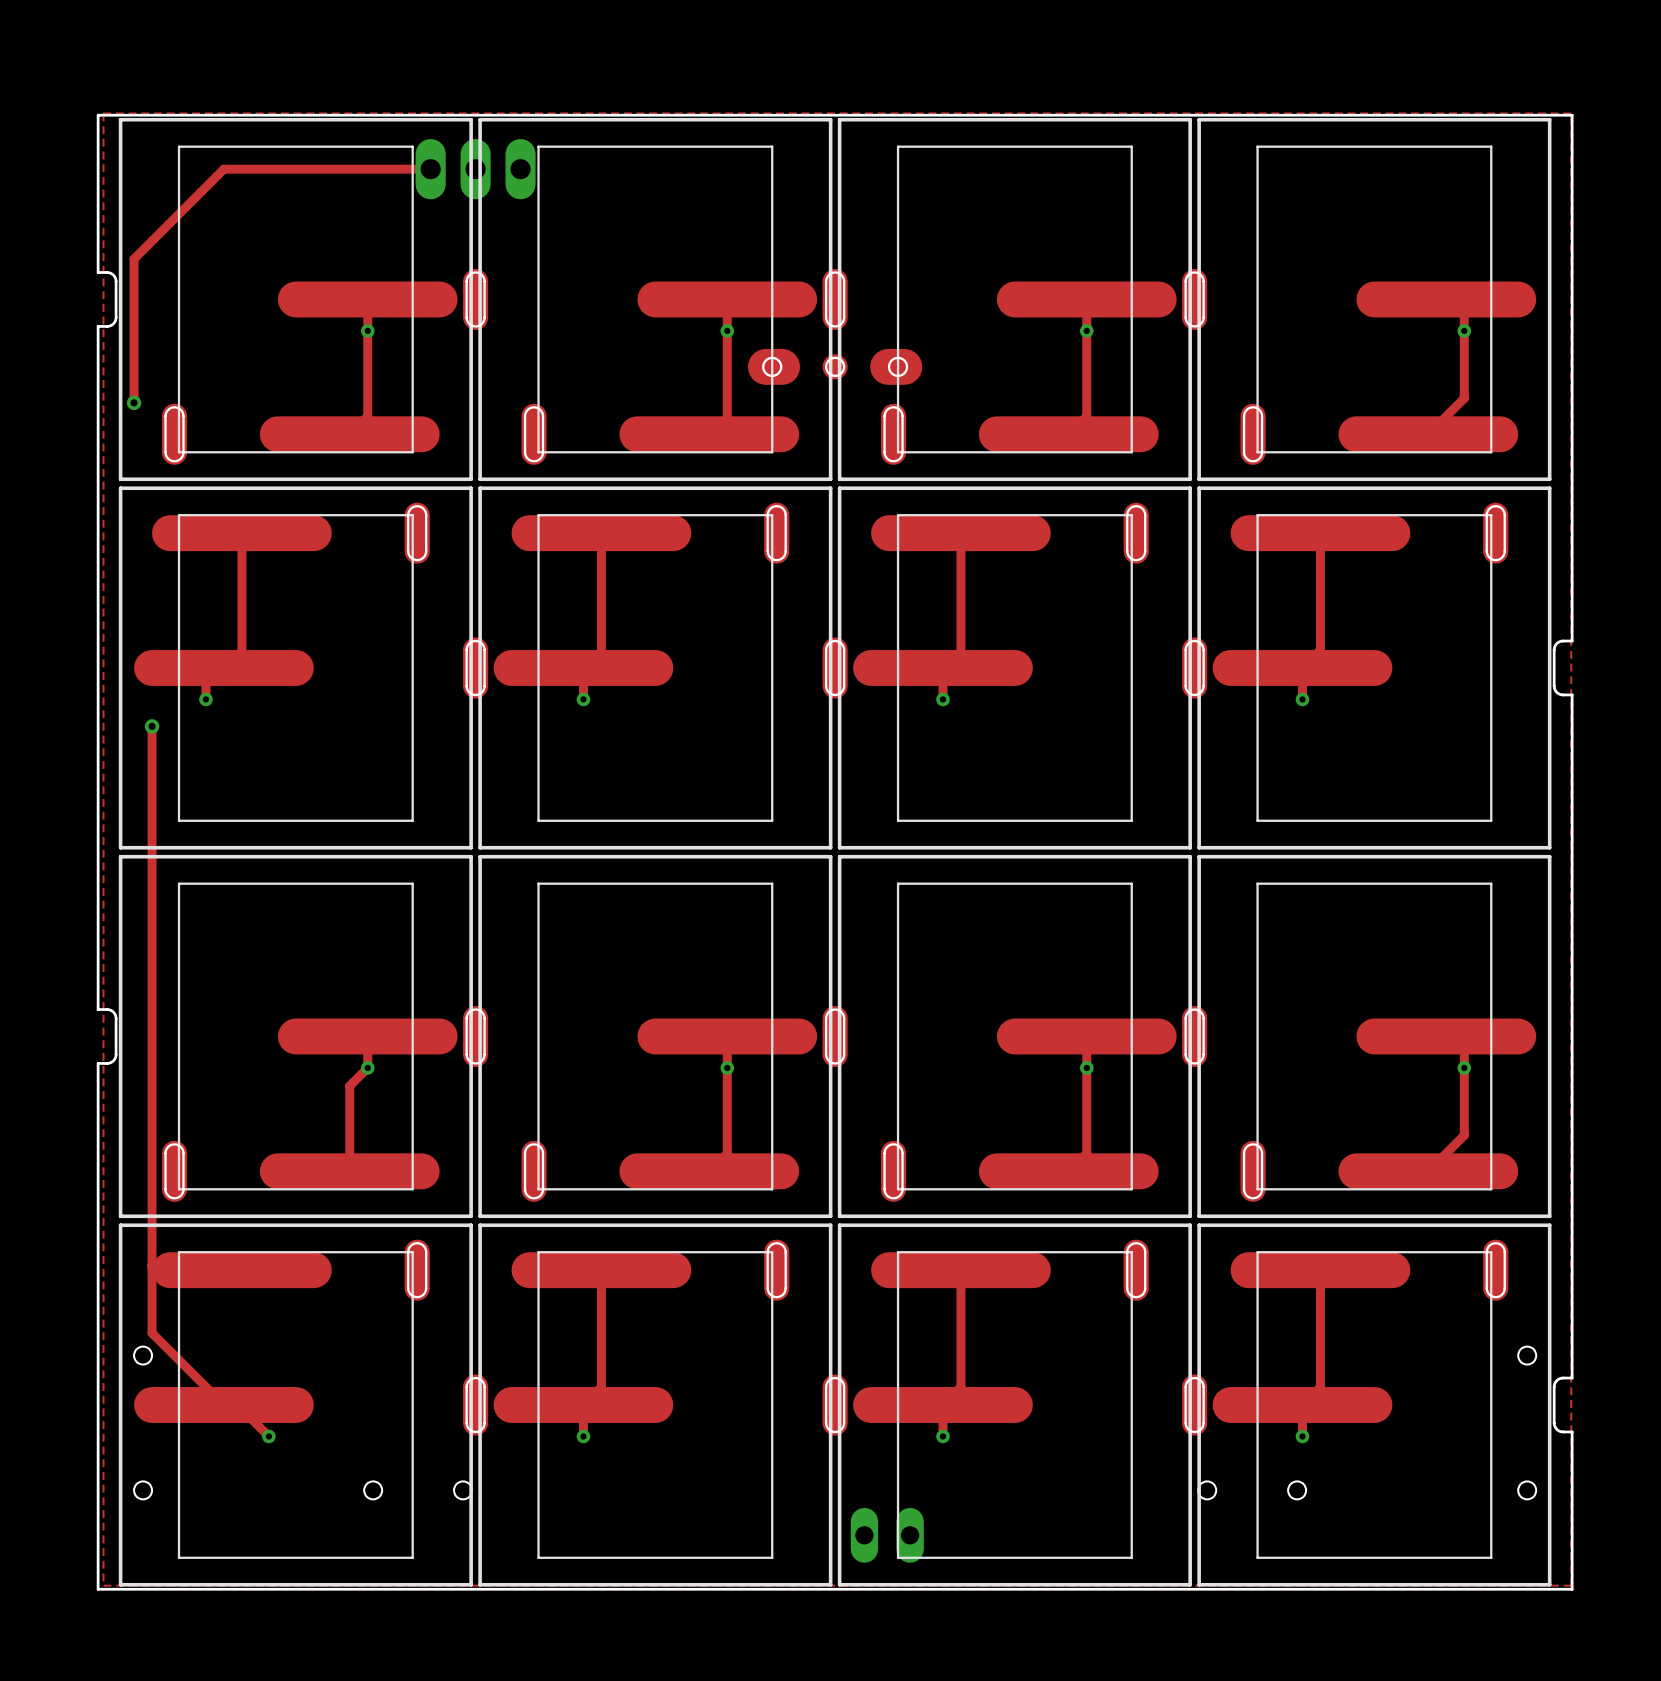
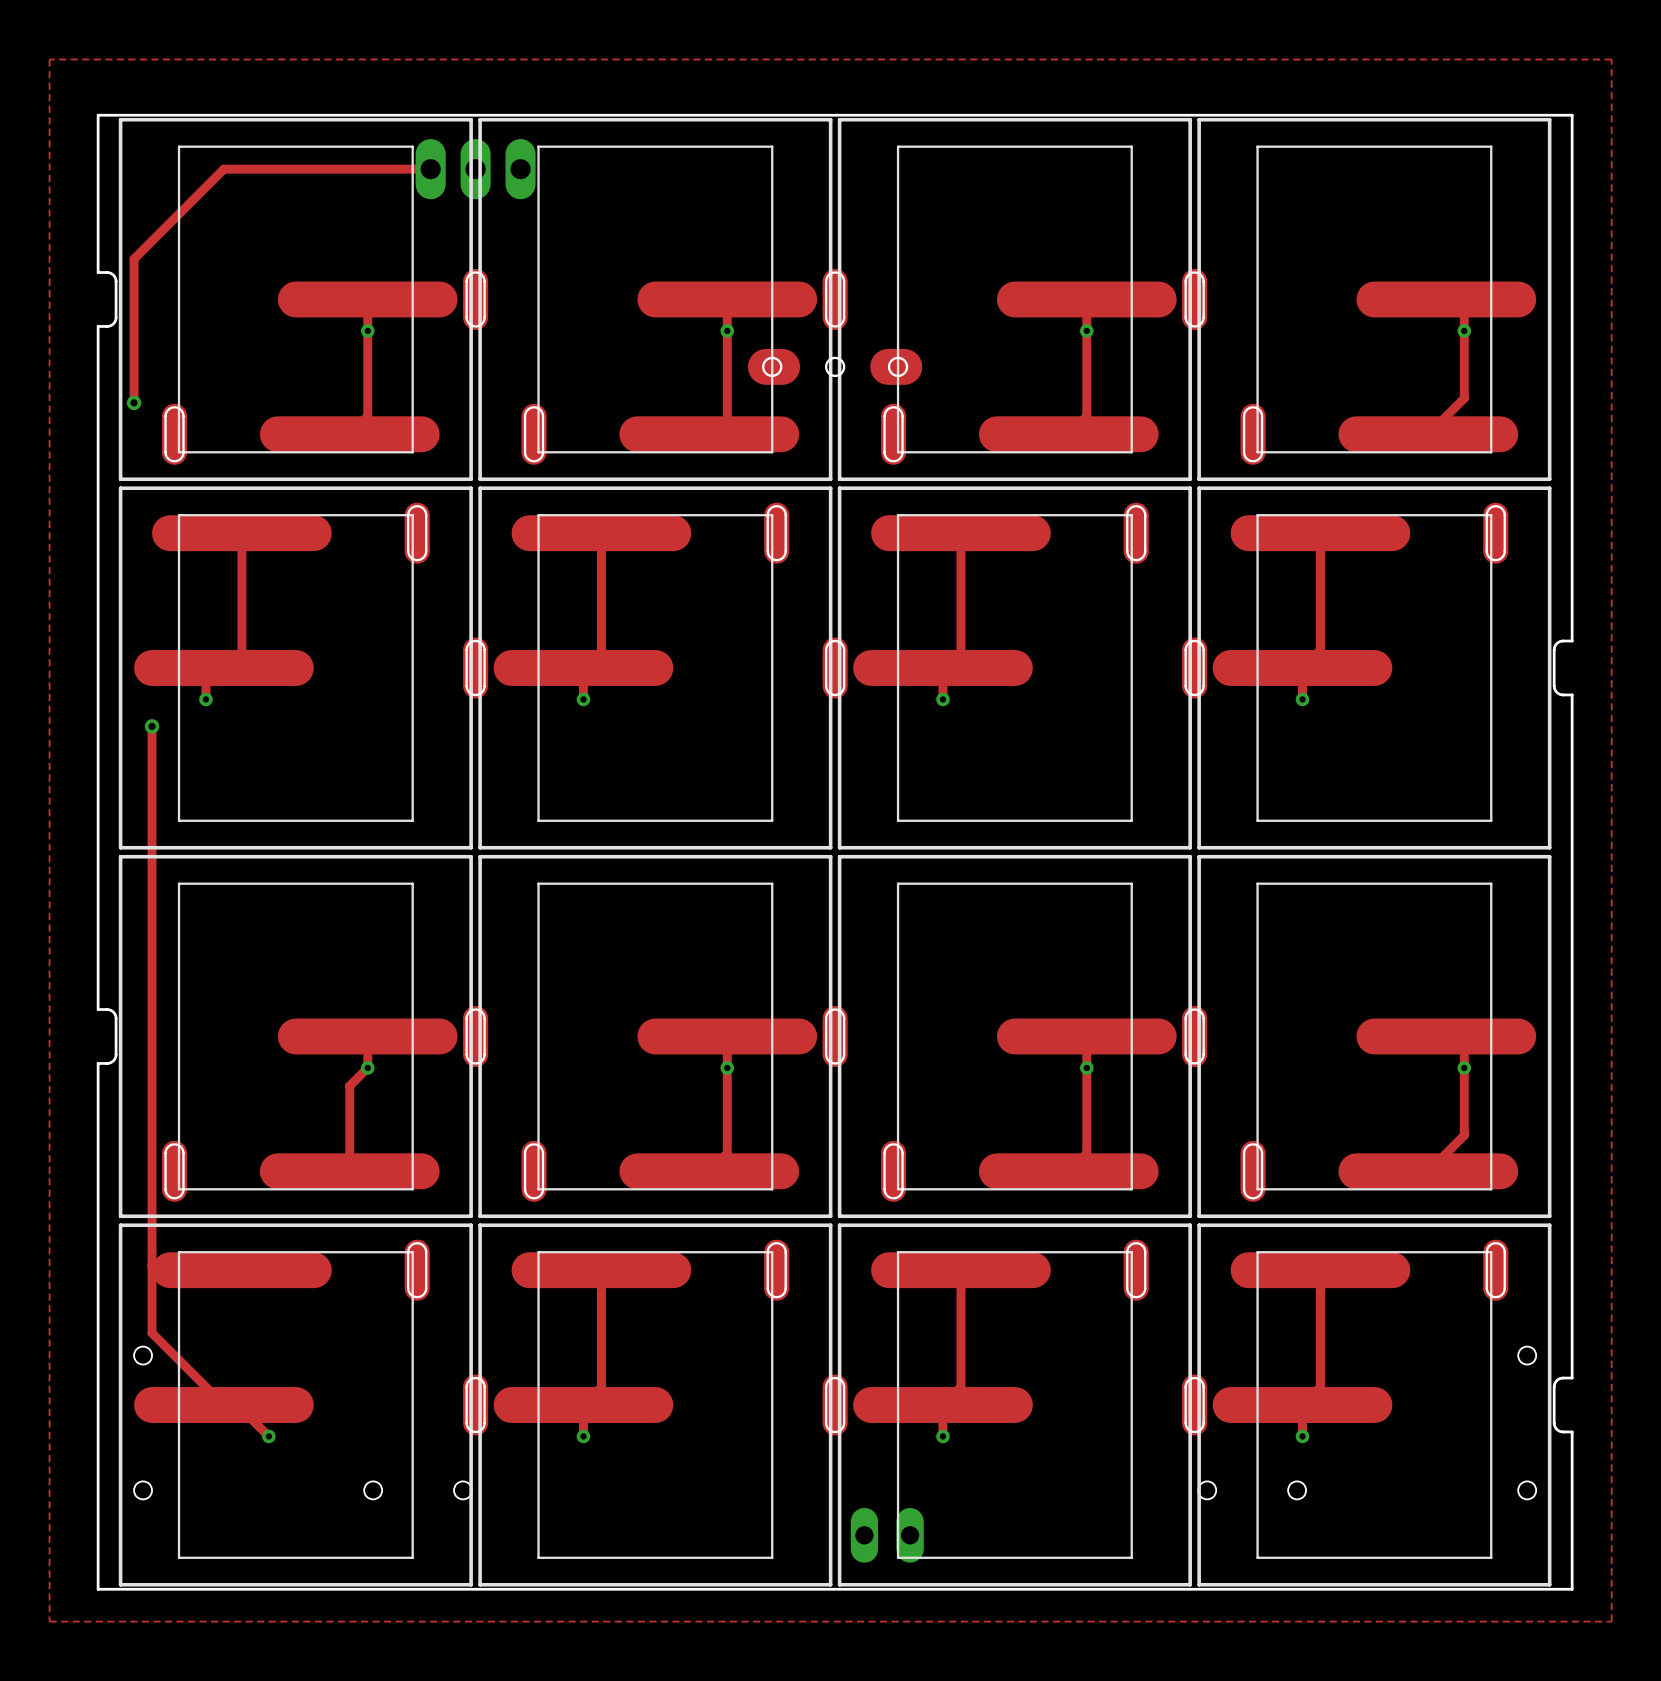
zone outline: (103, 113) (1571, 113) (1571, 1585) (103, 1585) (103, 113) -> (49, 59) (49, 1621) (1611, 1621) (1611, 59) (49, 59)
part footprint: [747, 348, 923, 385] -> [747, 348, 923, 385]

